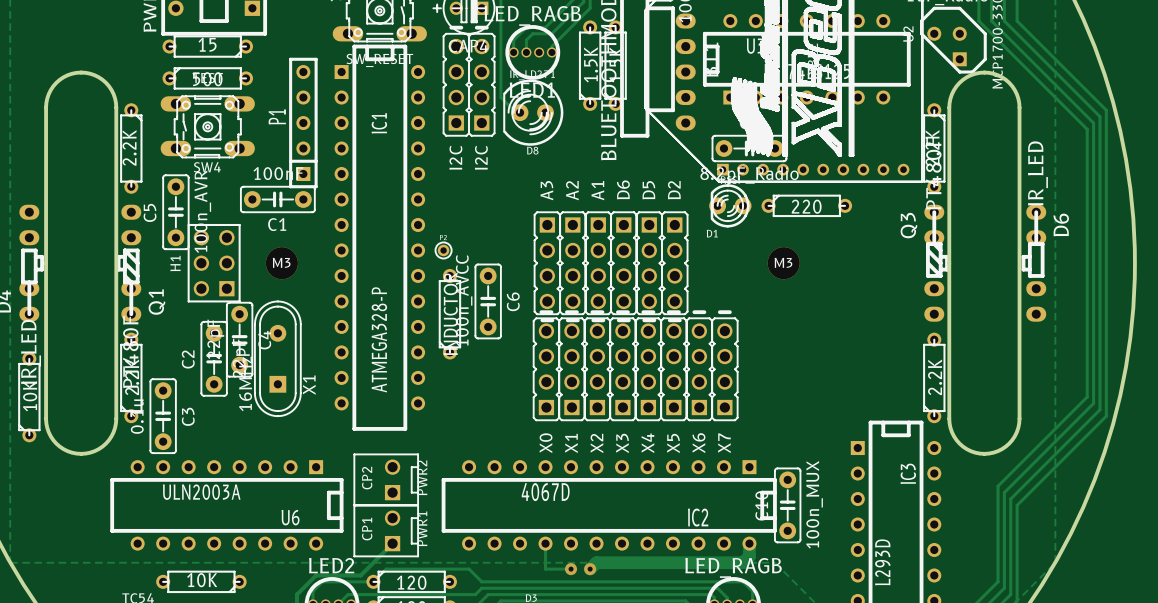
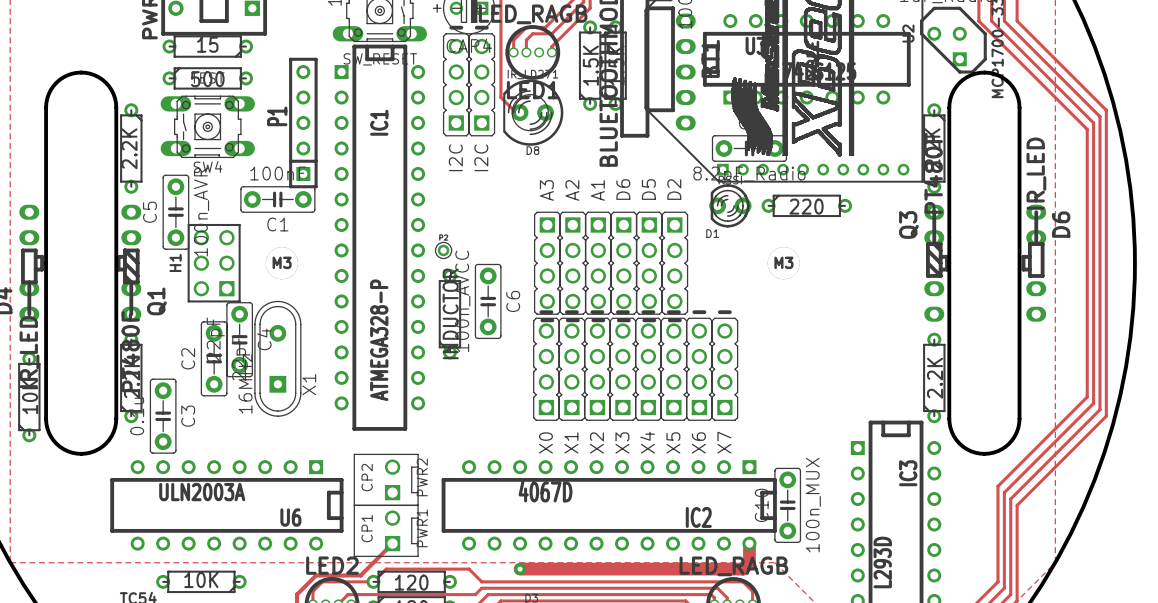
track: (545, 543) (545, 569) -> (520, 569) (545, 569)
track: (749, 556) (743, 562) (596, 562) (590, 569) -> (749, 556) (749, 562) (743, 569) (571, 569)
via: none -> (520, 569)
track width: thin (545, 569) (571, 569) -> thick (545, 569) (571, 569)
via: (571, 569) -> none
via: (590, 569) -> none

